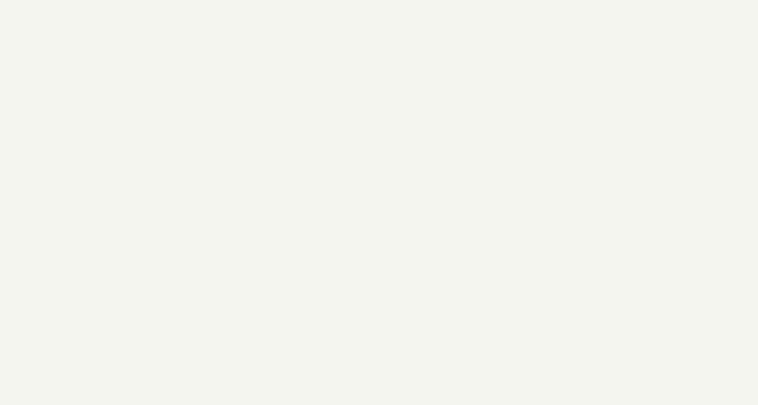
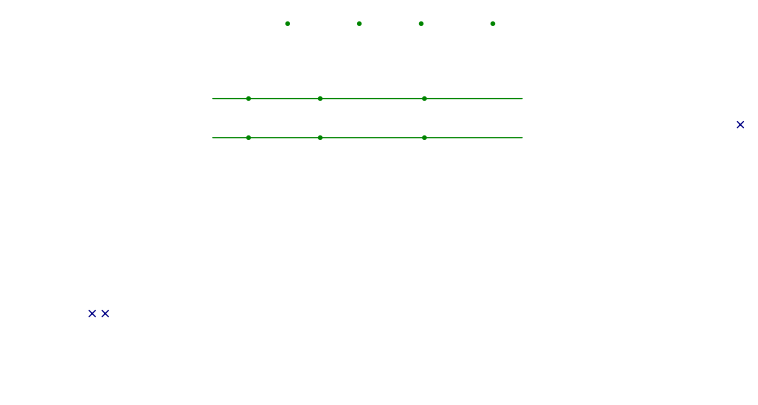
junction: none -> (287, 23)
junction: none -> (359, 23)
junction: none -> (421, 23)
junction: none -> (492, 23)
wire: none -> (212, 98) (522, 98)
junction: none -> (248, 98)
junction: none -> (320, 98)
junction: none -> (424, 98)
no-connect mark: none -> (740, 124)
wire: none -> (212, 137) (522, 137)
junction: none -> (248, 137)
junction: none -> (320, 137)
junction: none -> (424, 137)
no-connect mark: none -> (92, 313)
no-connect mark: none -> (105, 313)

